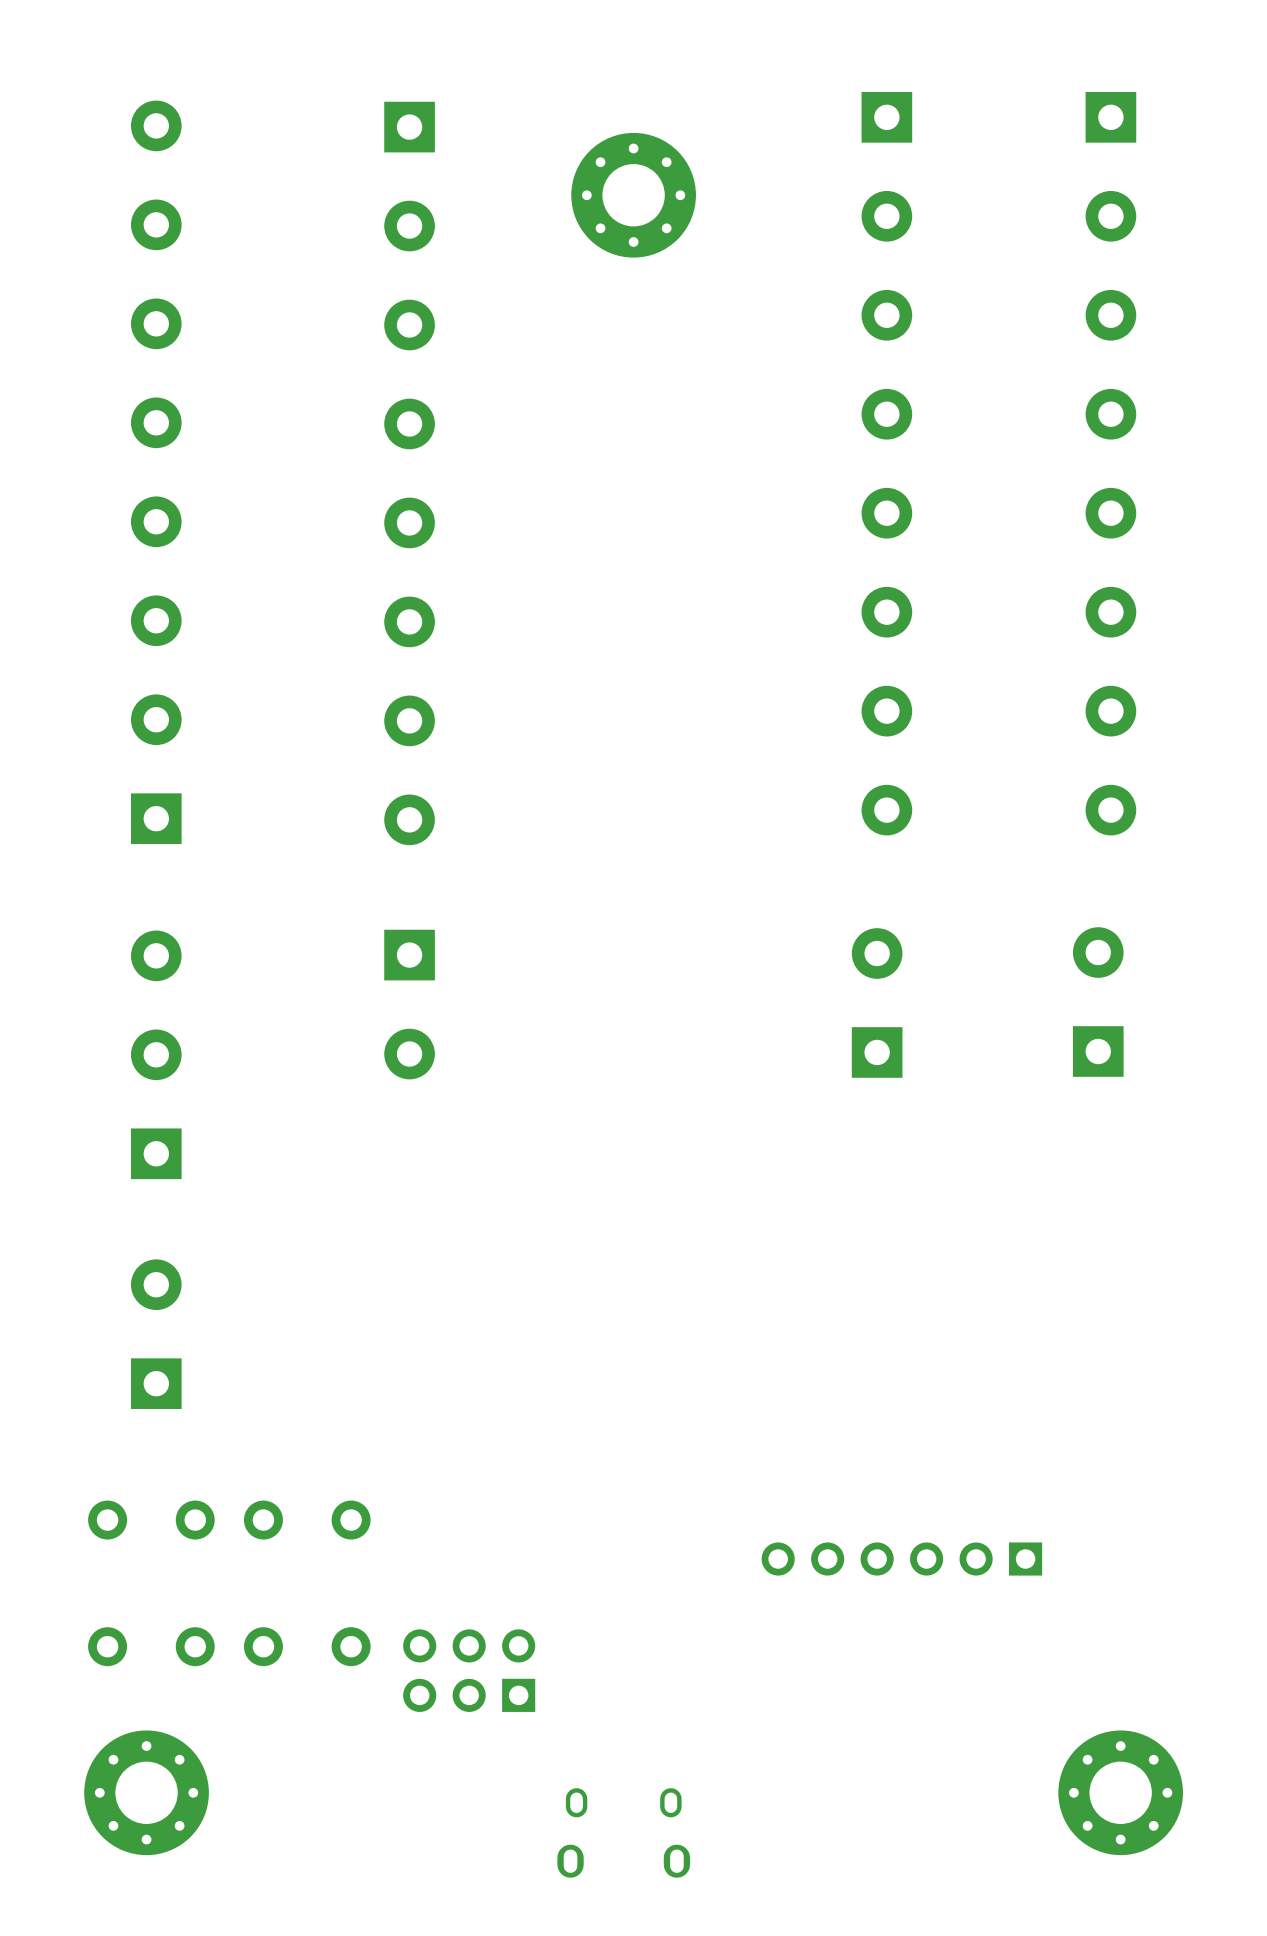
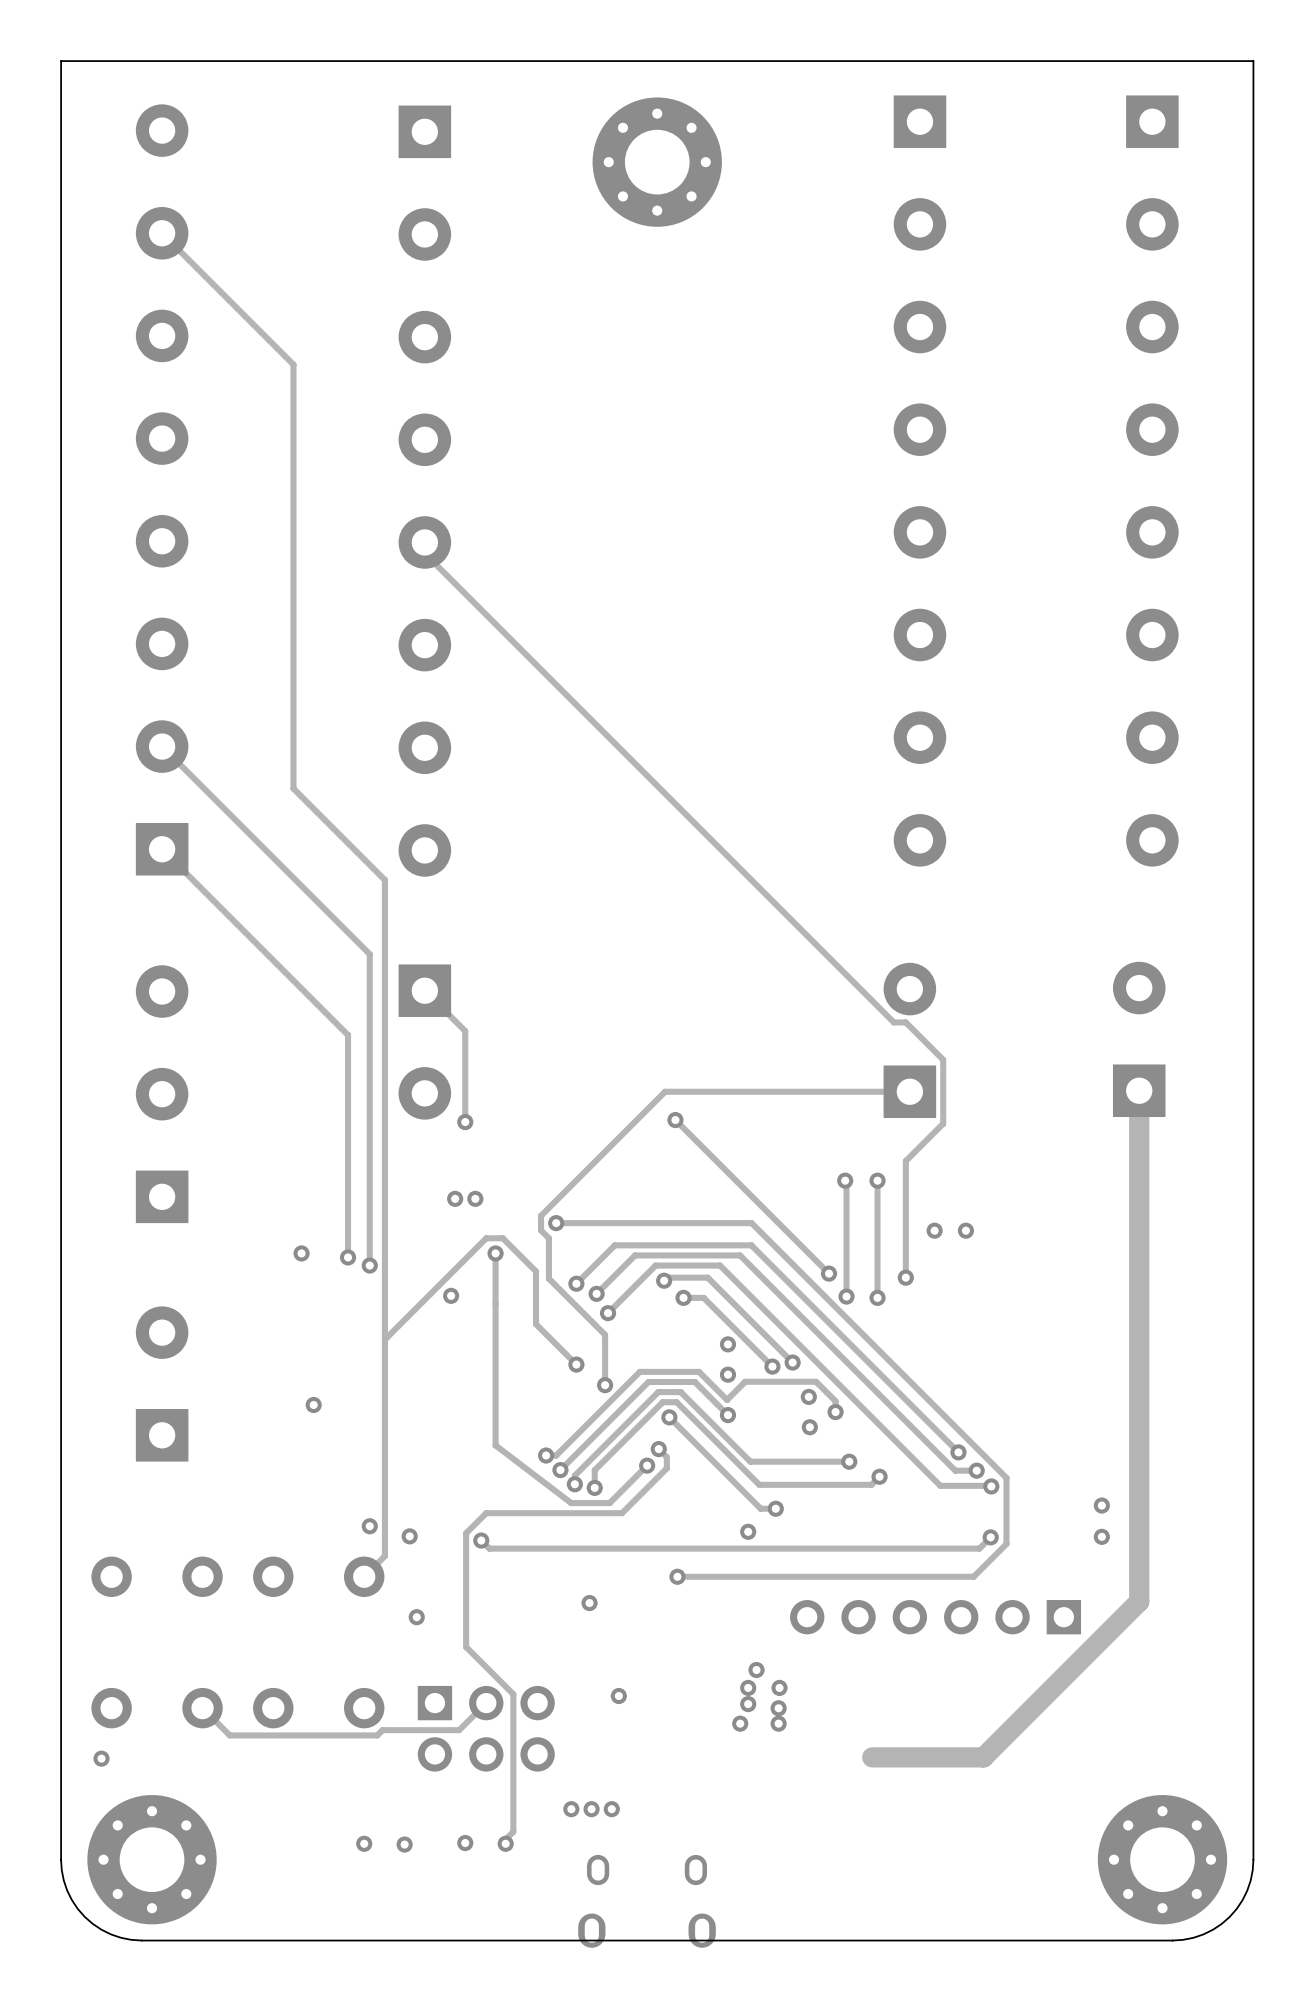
board edge: none -> (1253, 61) (61, 61) (61, 1859) (63, 1880) (71, 1900) (84, 1916) (101, 1929) (120, 1937) (141, 1940) (1172, 1940) (1193, 1937) (1213, 1929) (1229, 1916) (1242, 1900) (1250, 1880) (1253, 1859) (1253, 61)
part position: (633, 195) -> (657, 162)
track: none -> (162, 233) (293, 364) (293, 788) (384, 880) (384, 1556) (364, 1576)
track: none -> (424, 542) (424, 553) (893, 1022) (905, 1022) (943, 1059) (943, 1123) (905, 1161) (905, 1277)
track: none -> (162, 746) (369, 954) (369, 1265)
track: none -> (162, 849) (348, 1035) (348, 1257)
track: none -> (424, 990) (465, 1031) (465, 1122)
track: none -> (1139, 1090) (1139, 1601) (983, 1757) (872, 1757)
track: none -> (909, 1091) (665, 1091) (541, 1215) (541, 1230) (548, 1238) (548, 1278) (605, 1334) (605, 1385)
track: none -> (675, 1120) (829, 1273)
via: none -> (675, 1120)
via: none -> (465, 1122)
track: none -> (845, 1180) (846, 1296)
via: none -> (845, 1180)
track: none -> (877, 1180) (877, 1297)
via: none -> (877, 1180)
via: none -> (455, 1198)
via: none -> (475, 1198)
track: none -> (556, 1223) (751, 1223) (1006, 1477) (1006, 1544) (973, 1576) (677, 1576)
via: none -> (556, 1223)
via: none -> (934, 1230)
via: none -> (965, 1230)
via: none -> (301, 1253)
track: none -> (495, 1253) (495, 1445) (571, 1503) (609, 1503) (647, 1465)
via: none -> (495, 1253)
via: none -> (348, 1257)
via: none -> (369, 1265)
via: none -> (829, 1273)
via: none -> (905, 1277)
track: none -> (664, 1280) (667, 1277) (707, 1277) (792, 1362)
via: none -> (664, 1280)
track: none -> (576, 1283) (614, 1245) (751, 1245) (958, 1452)
via: none -> (576, 1283)
track: none -> (596, 1293) (635, 1255) (740, 1255) (955, 1470) (976, 1470)
via: none -> (596, 1293)
via: none -> (451, 1295)
via: none -> (846, 1296)
track: none -> (683, 1297) (703, 1297) (772, 1366)
via: none -> (683, 1297)
via: none -> (877, 1297)
track: none -> (608, 1313) (655, 1265) (720, 1265) (940, 1485) (991, 1486)
via: none -> (608, 1313)
track: none -> (384, 1339) (486, 1238) (502, 1238) (536, 1271) (536, 1324) (576, 1364)
via: none -> (727, 1344)
via: none -> (792, 1362)
via: none -> (576, 1364)
via: none -> (772, 1366)
via: none -> (727, 1374)
via: none -> (605, 1385)
via: none -> (808, 1396)
via: none -> (313, 1405)
track: none -> (835, 1412) (835, 1401) (816, 1381) (745, 1381) (727, 1399) (699, 1371) (639, 1371) (556, 1455) (546, 1455)
via: none -> (835, 1412)
track: none -> (727, 1415) (694, 1381) (648, 1381) (560, 1470)
via: none -> (727, 1415)
track: none -> (669, 1417) (760, 1508) (775, 1508)
via: none -> (669, 1417)
via: none -> (809, 1427)
track: none -> (658, 1449) (666, 1457) (666, 1468) (622, 1513) (486, 1513) (466, 1533) (466, 1647) (513, 1694) (513, 1831) (505, 1839) (505, 1843)
via: none -> (658, 1449)
via: none -> (958, 1452)
via: none -> (546, 1455)
track: none -> (849, 1461) (750, 1461) (680, 1392) (658, 1392) (574, 1475) (574, 1484)
via: none -> (849, 1461)
via: none -> (647, 1465)
via: none -> (560, 1470)
via: none -> (976, 1470)
track: none -> (879, 1476) (871, 1484) (759, 1484) (676, 1402) (662, 1402) (594, 1470) (594, 1487)
via: none -> (879, 1476)
via: none -> (574, 1484)
via: none -> (991, 1486)
via: none -> (594, 1487)
via: none -> (1101, 1505)
via: none -> (775, 1508)
via: none -> (369, 1526)
via: none -> (748, 1531)
via: none -> (409, 1536)
via: none -> (1101, 1536)
track: none -> (990, 1537) (979, 1548) (489, 1548) (481, 1540)
via: none -> (990, 1537)
via: none -> (481, 1540)
via: none -> (677, 1576)
via: none -> (589, 1603)
via: none -> (416, 1617)
via: none -> (756, 1669)
via: none -> (748, 1687)
via: none -> (779, 1687)
via: none -> (618, 1696)
track: none -> (486, 1703) (459, 1730) (382, 1730) (377, 1735) (229, 1735) (202, 1708)
via: none -> (748, 1704)
via: none -> (778, 1708)
via: none -> (740, 1723)
via: none -> (778, 1723)
part rotation: 0° (469, 1670) -> 180° (486, 1728)
via: none -> (101, 1758)
via: none -> (571, 1809)
via: none -> (591, 1809)
via: none -> (611, 1809)
via: none -> (465, 1843)
via: none -> (364, 1843)
via: none -> (505, 1843)
via: none -> (404, 1844)

